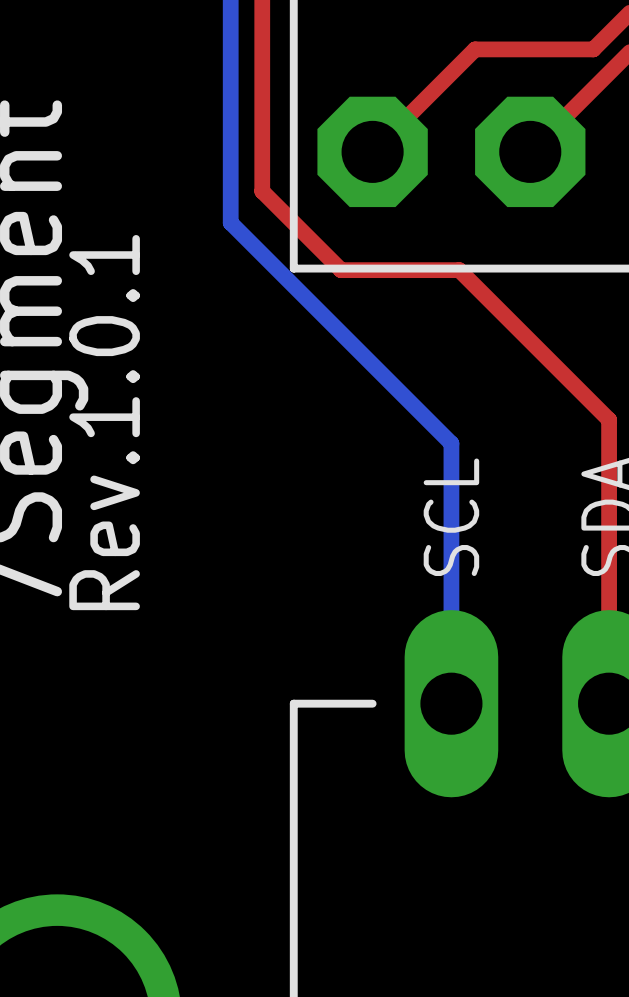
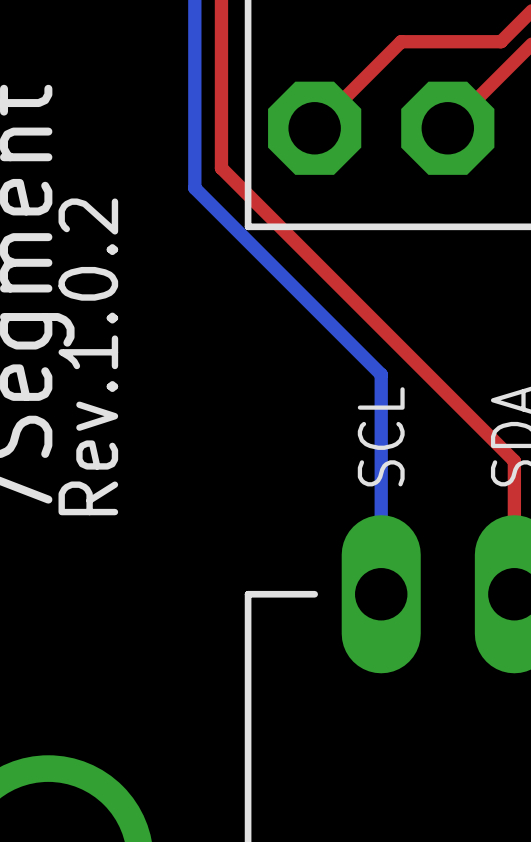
top track: (262, 191) (341, 270) (459, 270) (609, 419) (609, 546) -> (221, 161) (221, 168) (514, 461)
text: Rev.1.0.1 (104, 422) -> Rev.1.0.2 (88, 356)

